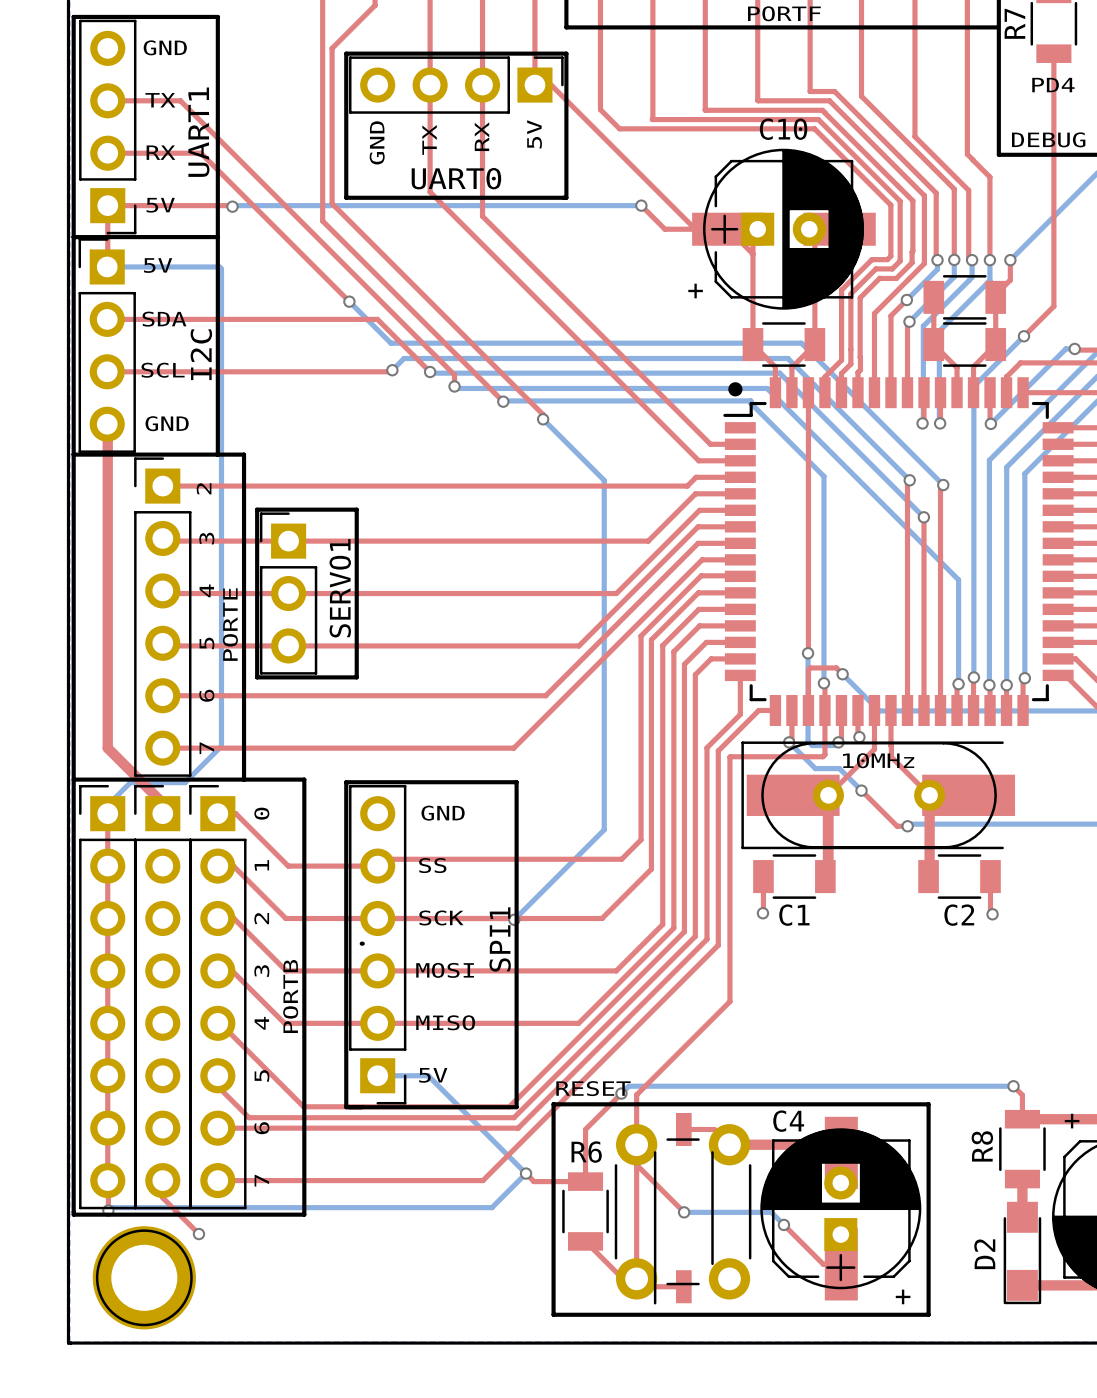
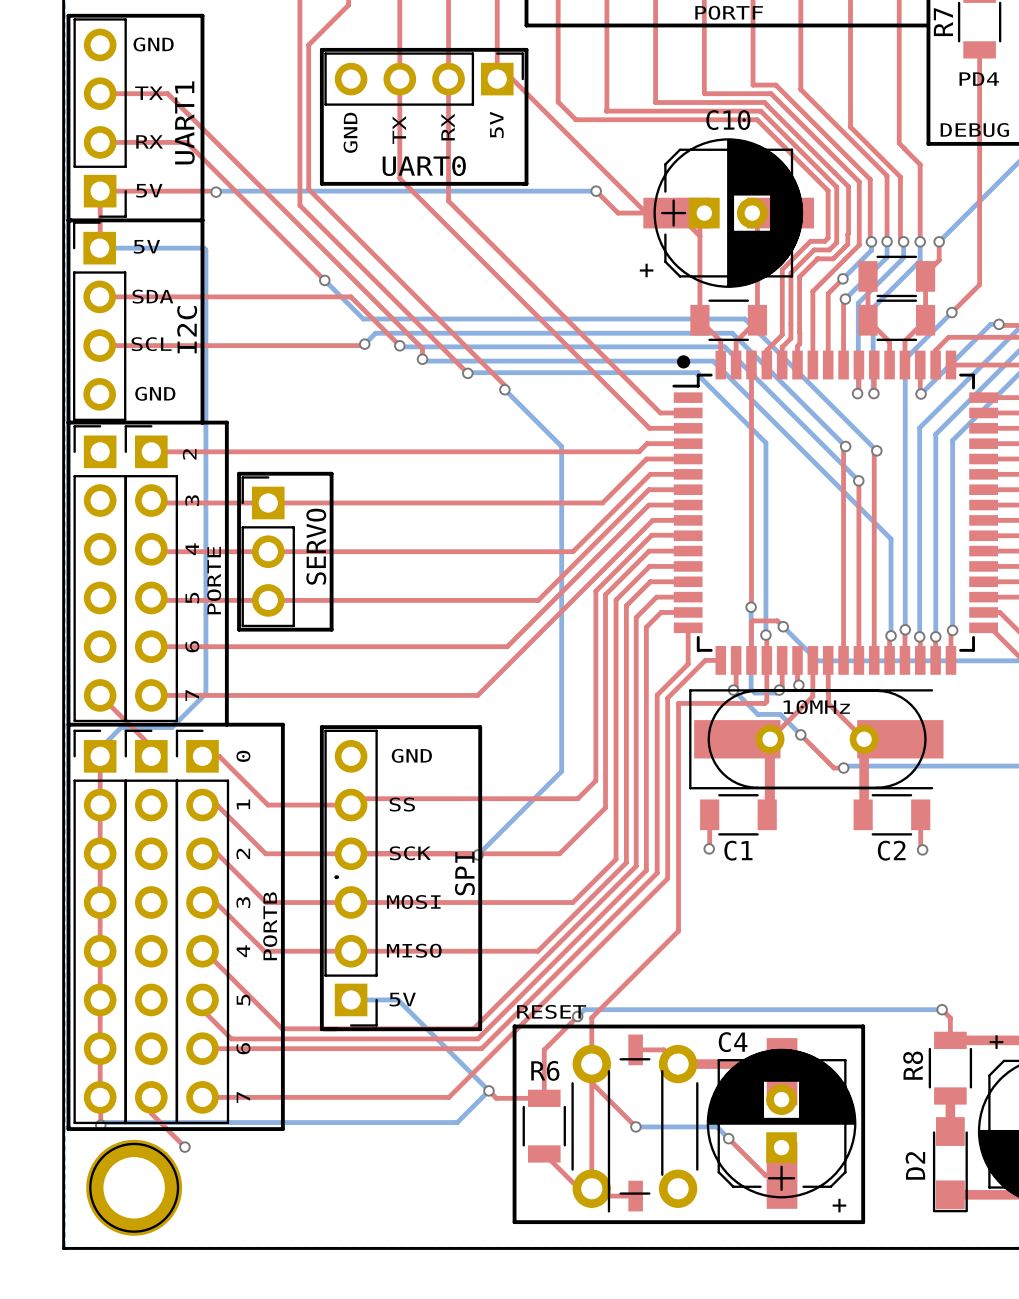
top track: (107, 424) (107, 748) (162, 803) -> none
SERVO1 name: SERVO1 (340, 588) -> SERVO (316, 546)
part: none -> (100, 573)
SPI1 name: SPI1 (500, 939) -> SPI (464, 873)

